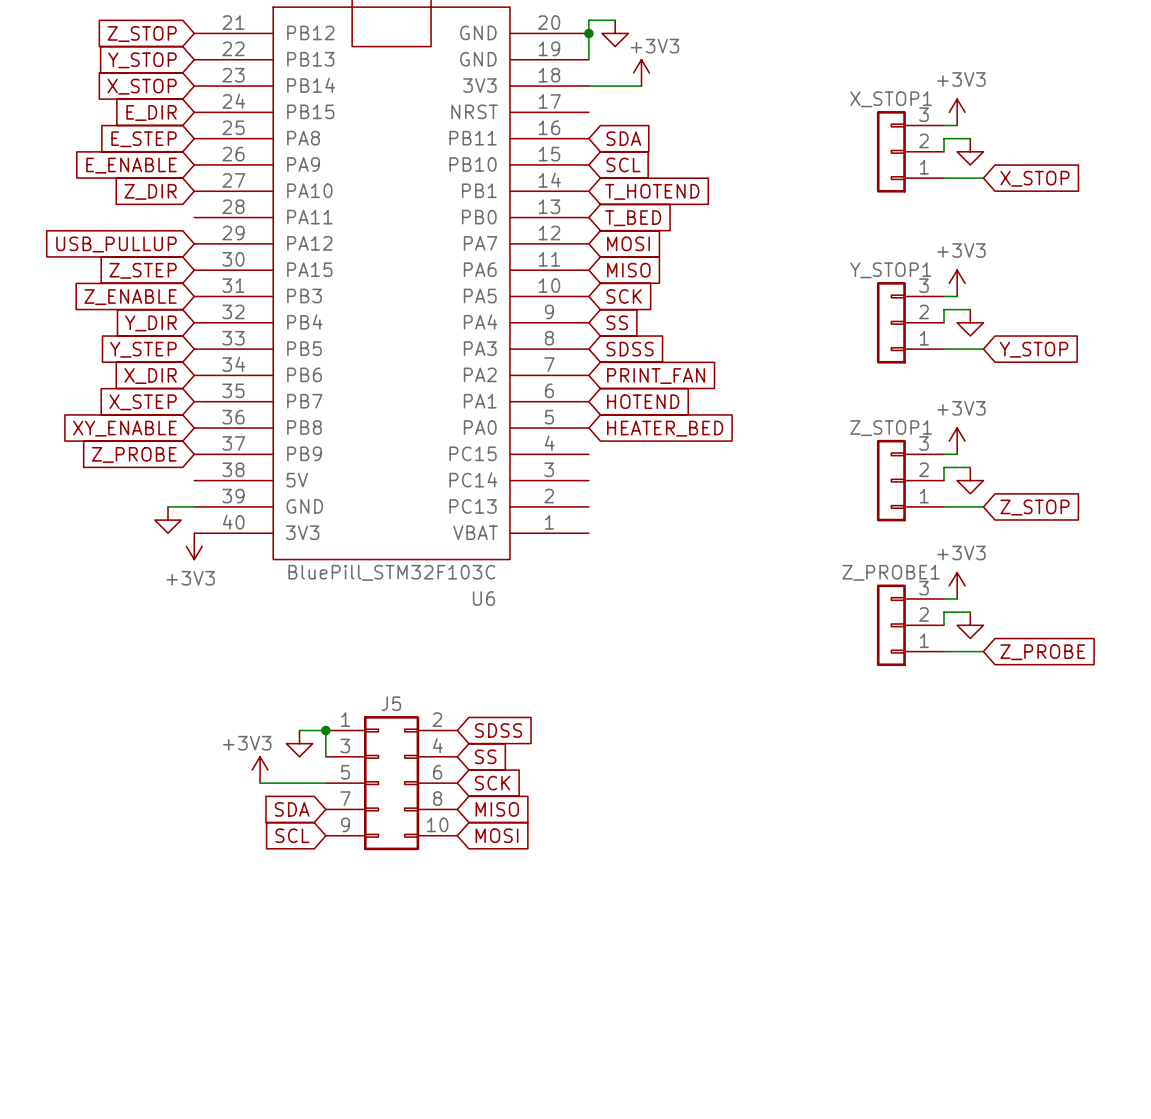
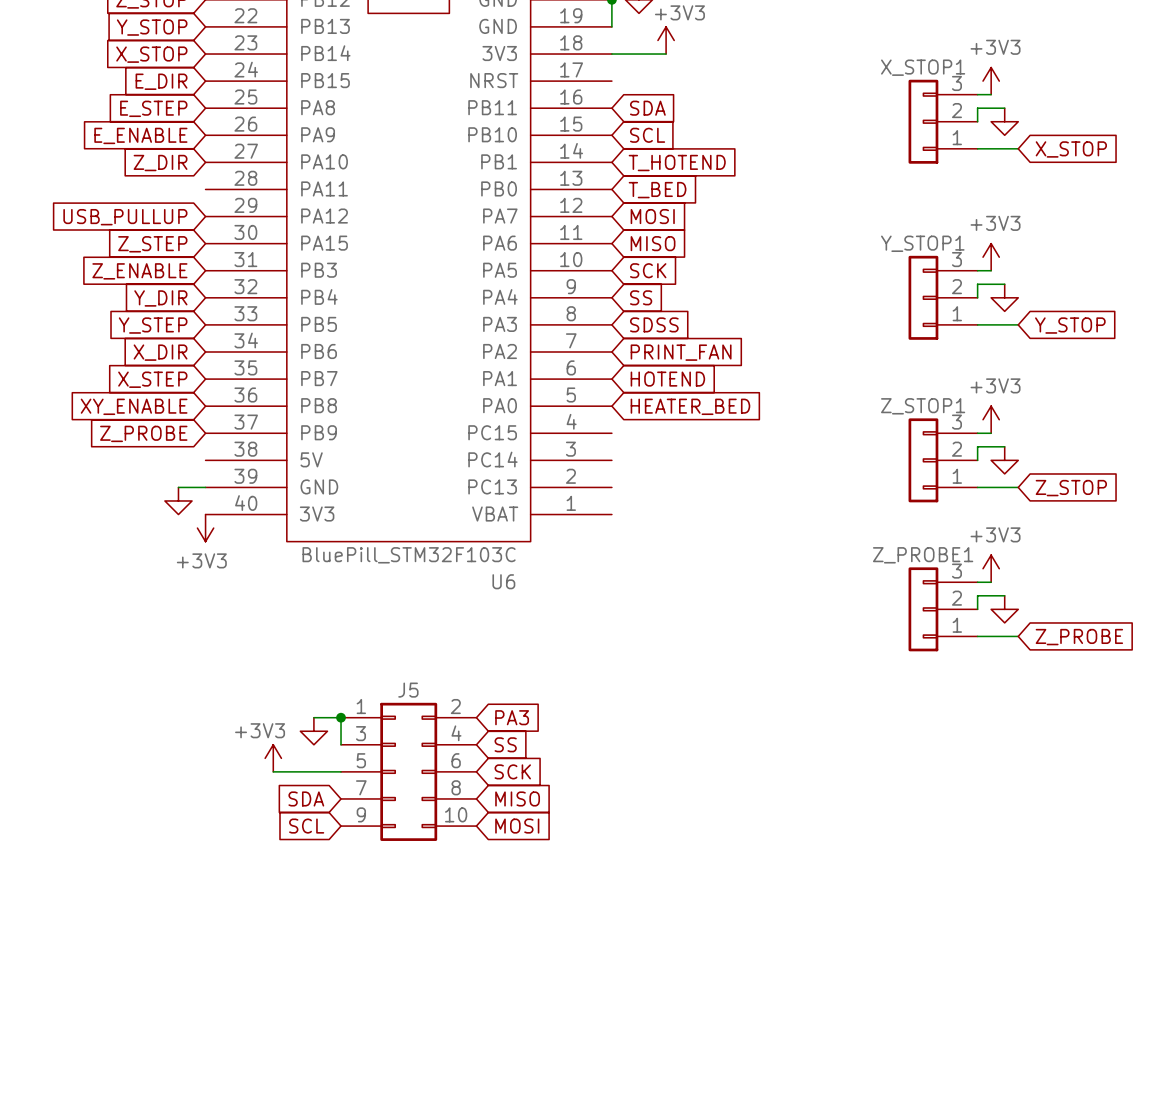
global label: SDSS (498, 730) -> PA3 (512, 717)

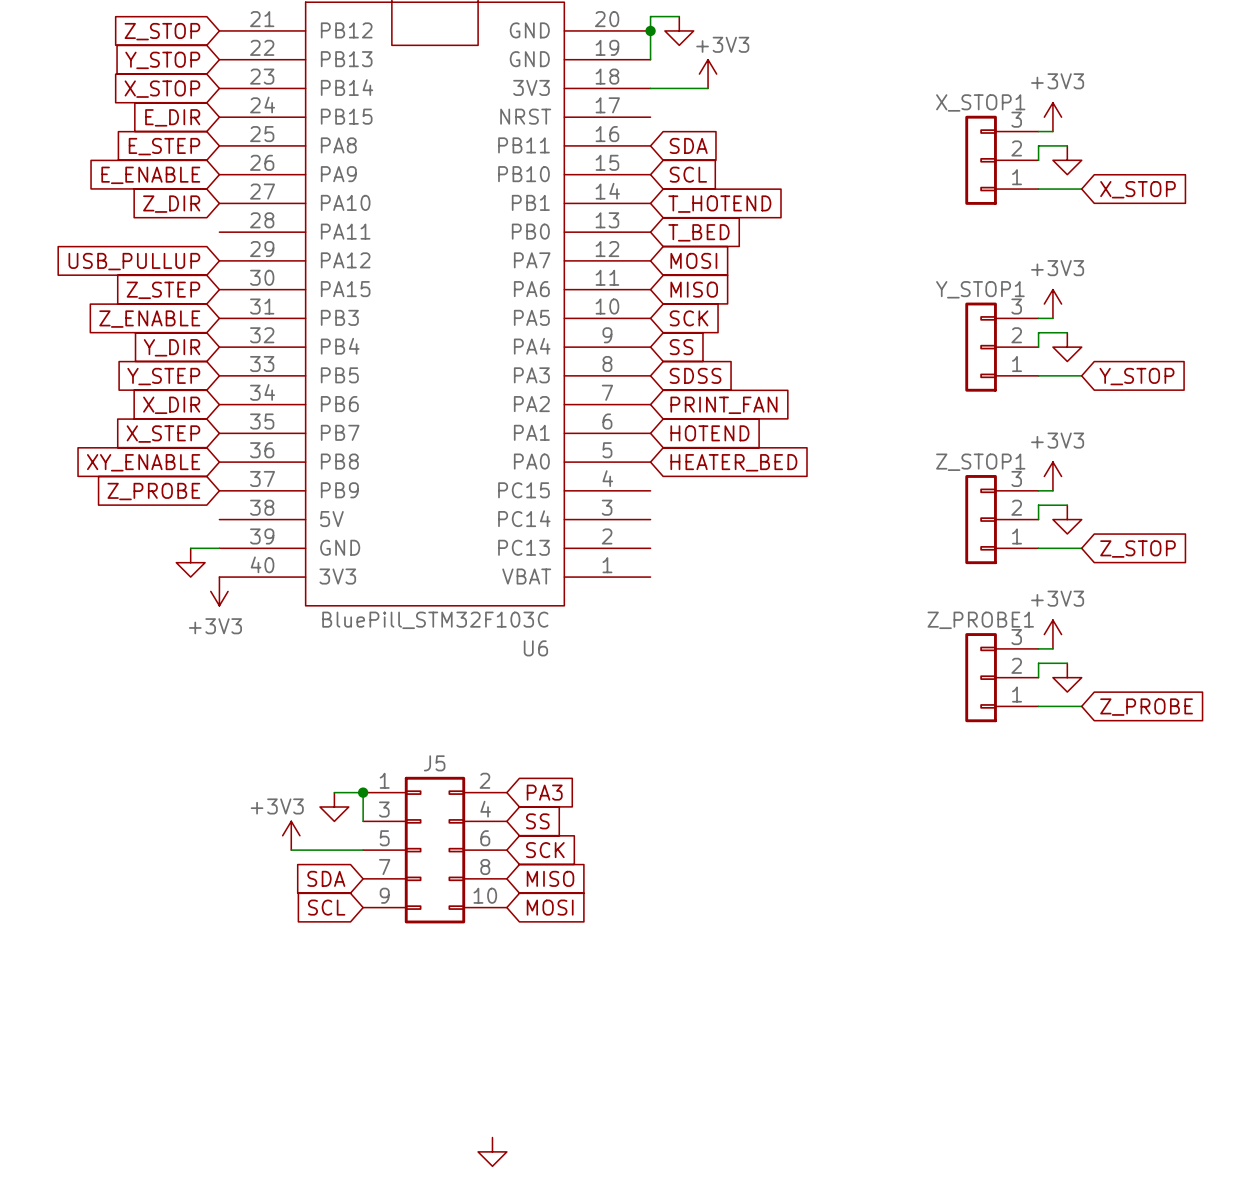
power symbol: none -> (492, 1151)

